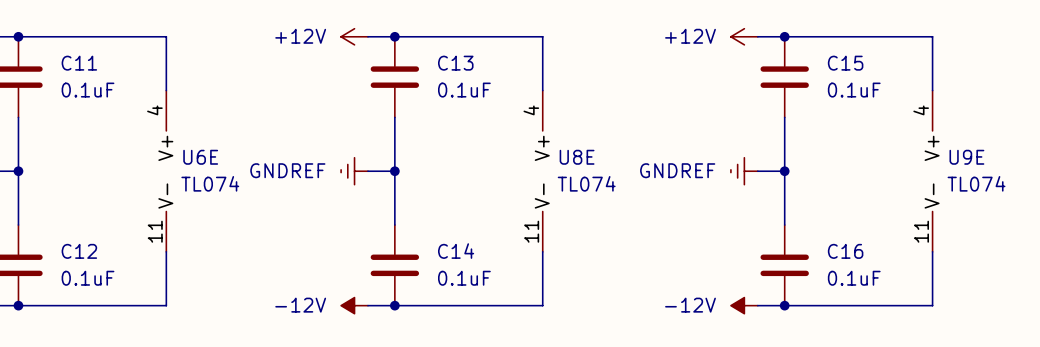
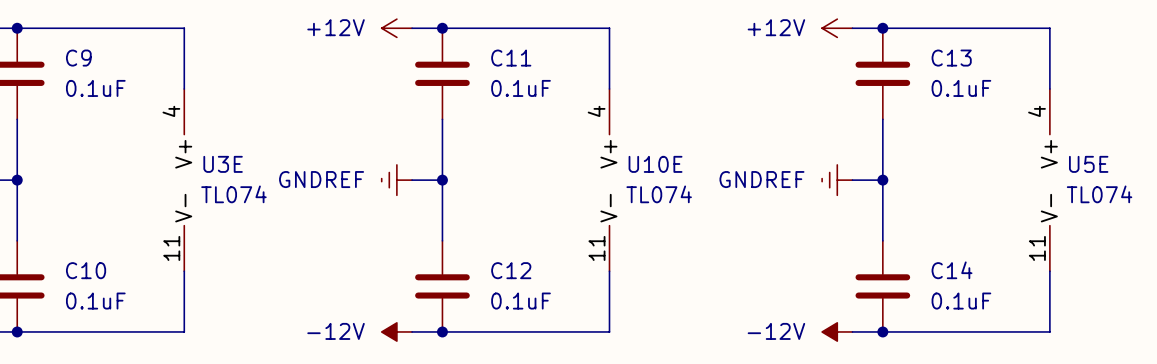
C11 name: C11 (79, 63) -> C9 (78, 58)
C13 name: C13 (455, 63) -> C11 (511, 58)
C15 name: C15 (845, 63) -> C13 (951, 58)
U6E name: U6E (200, 157) -> U3E (223, 164)
U8E name: U8E (577, 157) -> U10E (655, 164)
U9E name: U9E (966, 157) -> U5E (1088, 164)
C12 name: C12 (79, 251) -> C10 (86, 270)
C14 name: C14 (456, 251) -> C12 (511, 270)
C16 name: C16 (845, 251) -> C14 (952, 270)

